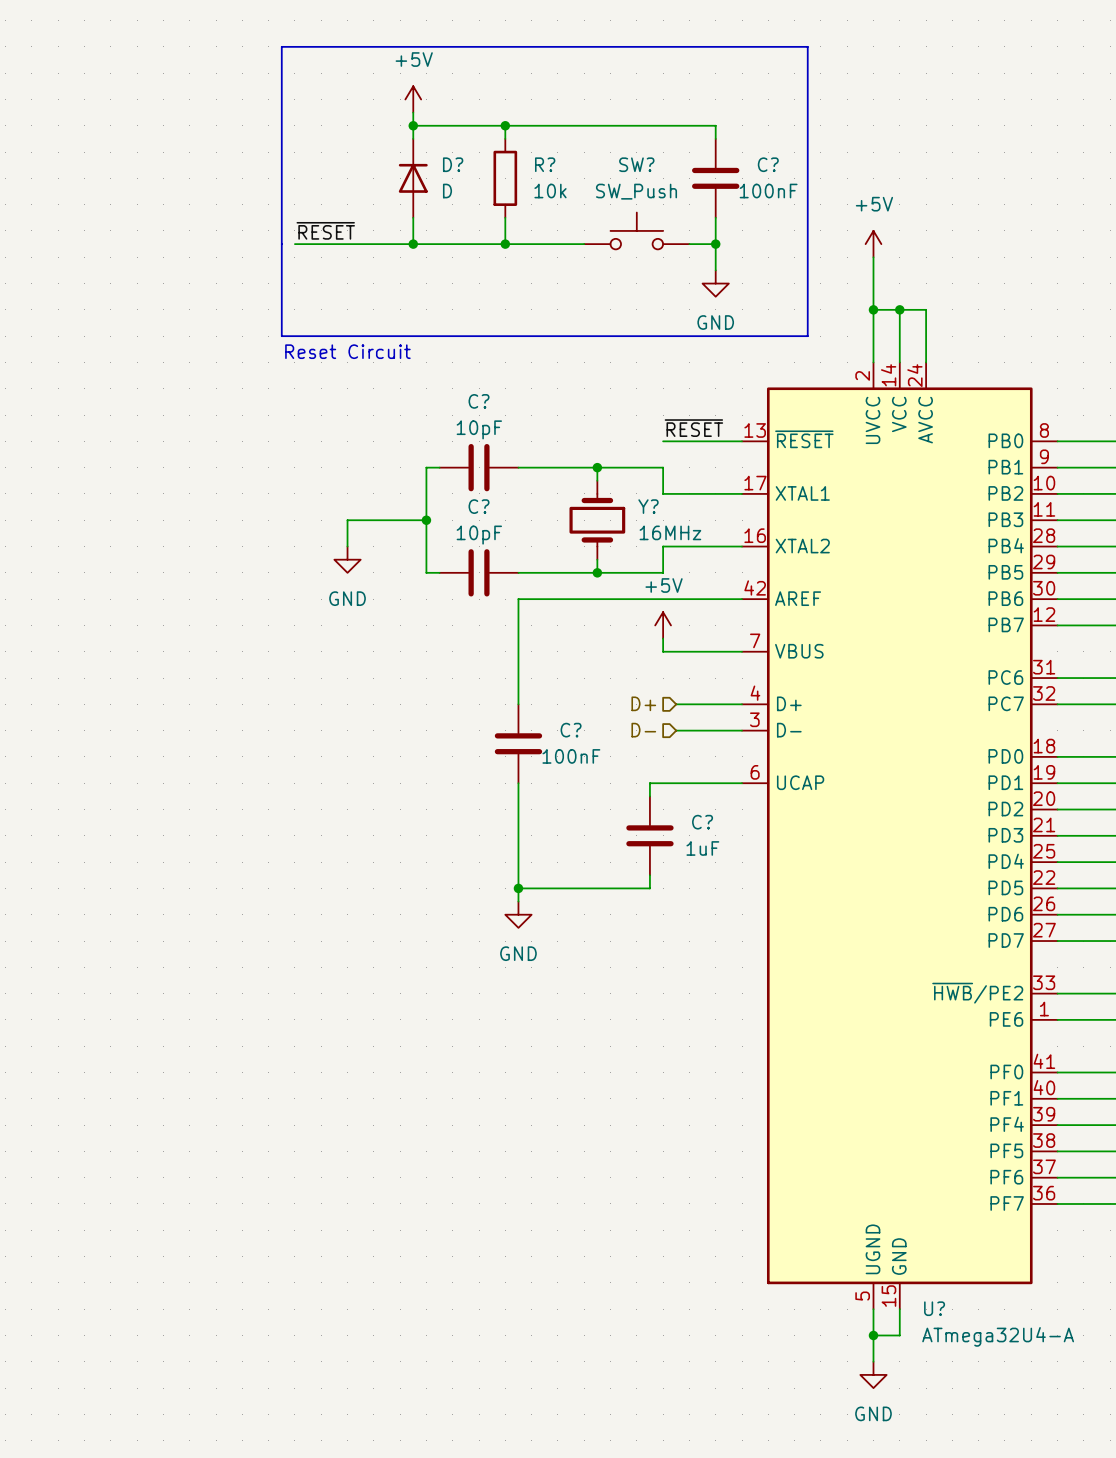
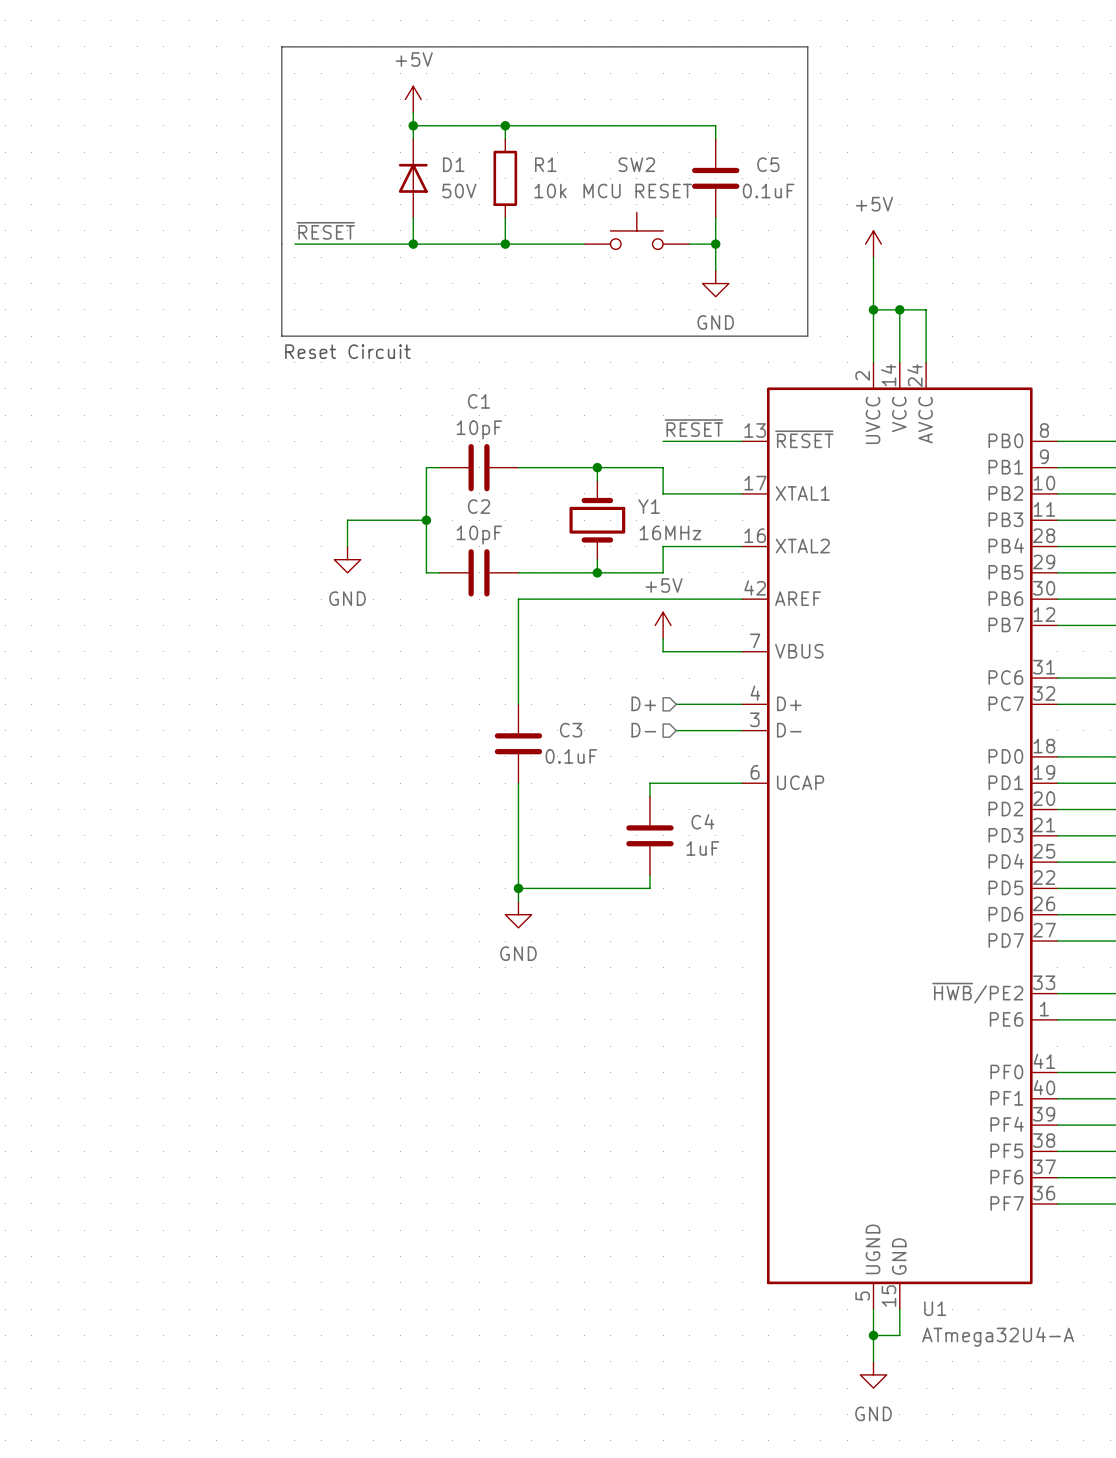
D? name: D? (453, 164) -> D1 (453, 164)
R? name: R? (545, 164) -> R1 (545, 164)
SW? name: SW? (636, 164) -> SW2 (636, 164)
C? name: C? (768, 164) -> C5 (768, 164)
D? value: D (447, 191) -> 50V (459, 191)
SW? value: SW_Push (636, 191) -> MCU RESET (637, 191)
C? value: 100nF (768, 191) -> 0.1uF (768, 191)
C? name: C? (479, 401) -> C1 (479, 401)
C? name: C? (479, 506) -> C2 (479, 506)
Y? name: Y? (648, 506) -> Y1 (649, 506)
C? name: C? (571, 730) -> C3 (571, 730)
C? value: 100nF (571, 756) -> 0.1uF (571, 756)
C? name: C? (702, 822) -> C4 (702, 821)
U? name: U? (934, 1308) -> U1 (935, 1308)

